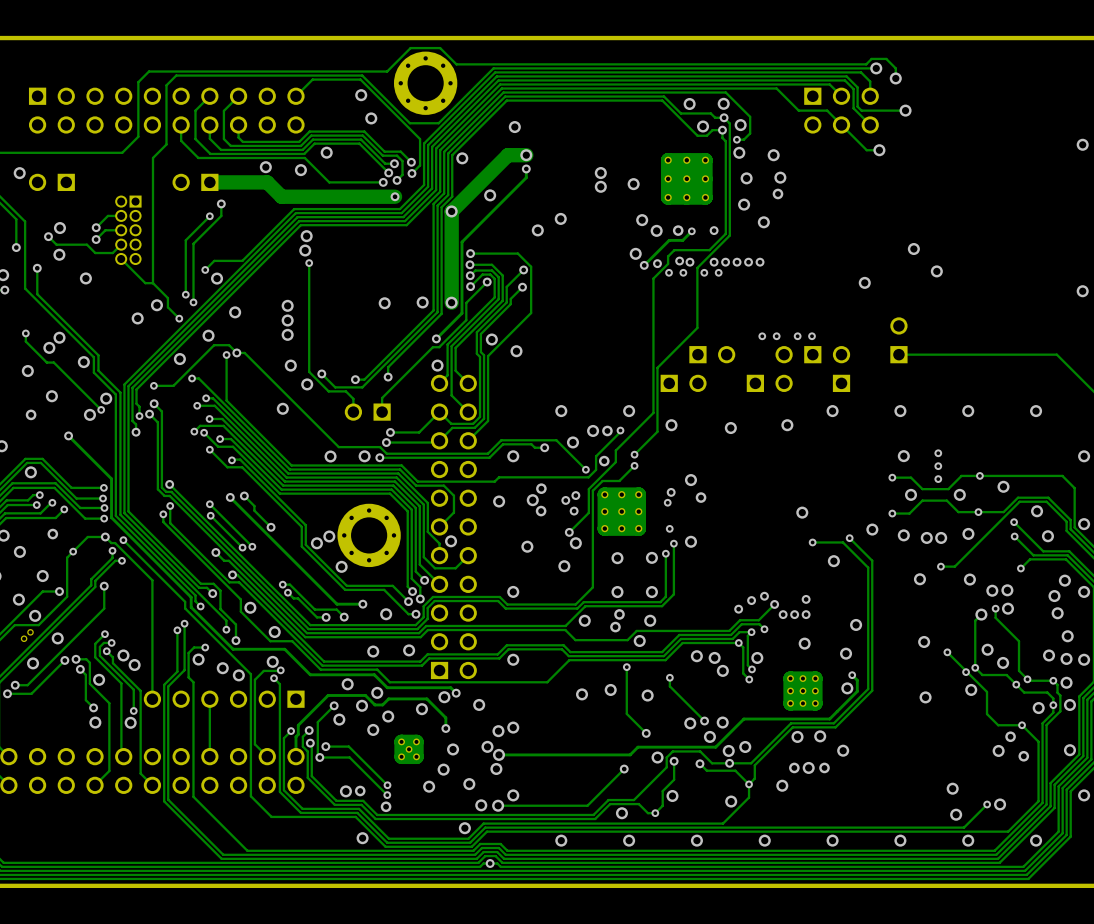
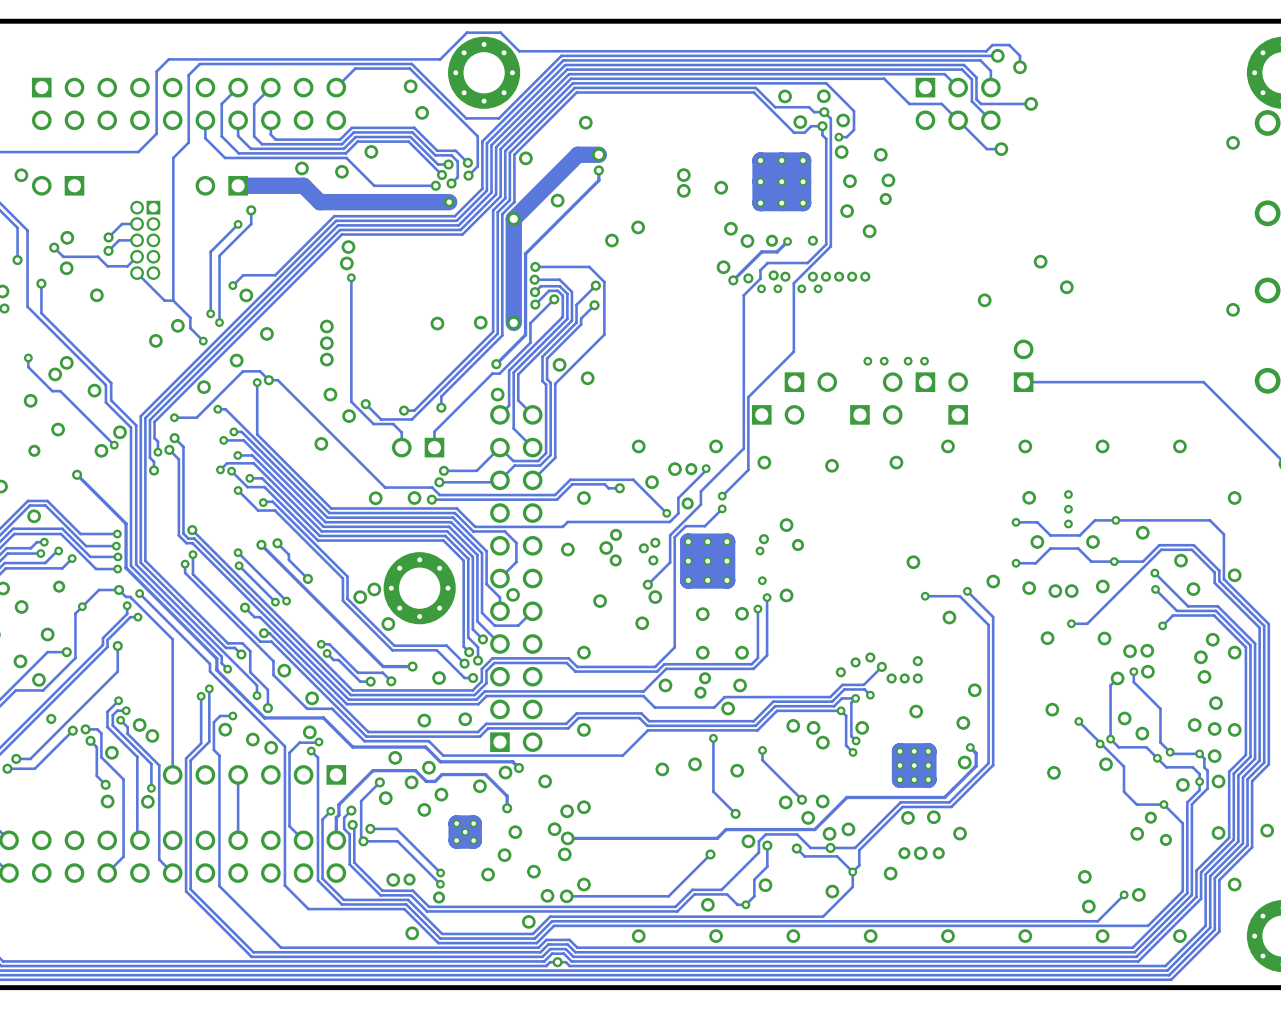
part: (27, 635) -> none
via: (57, 638) -> none
via: none -> (51, 718)
via: (33, 663) -> none

